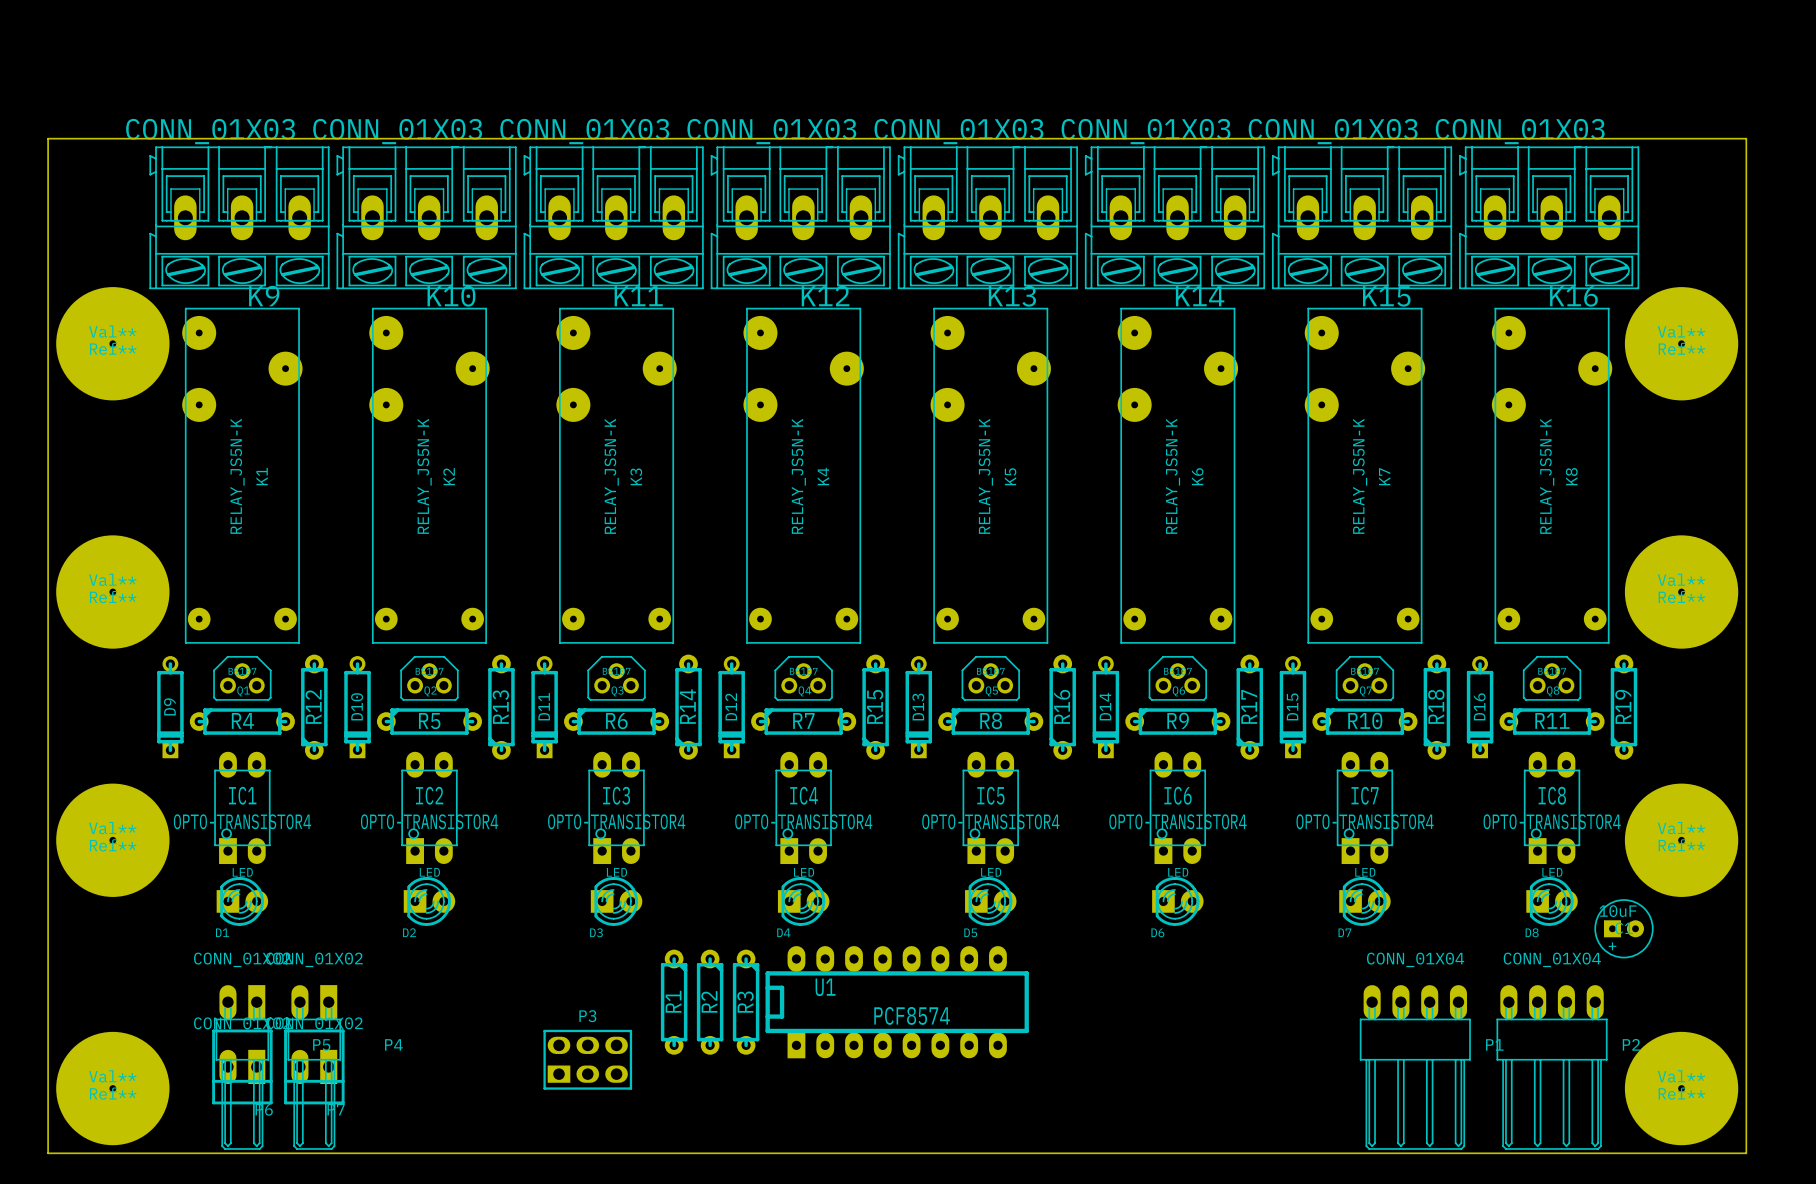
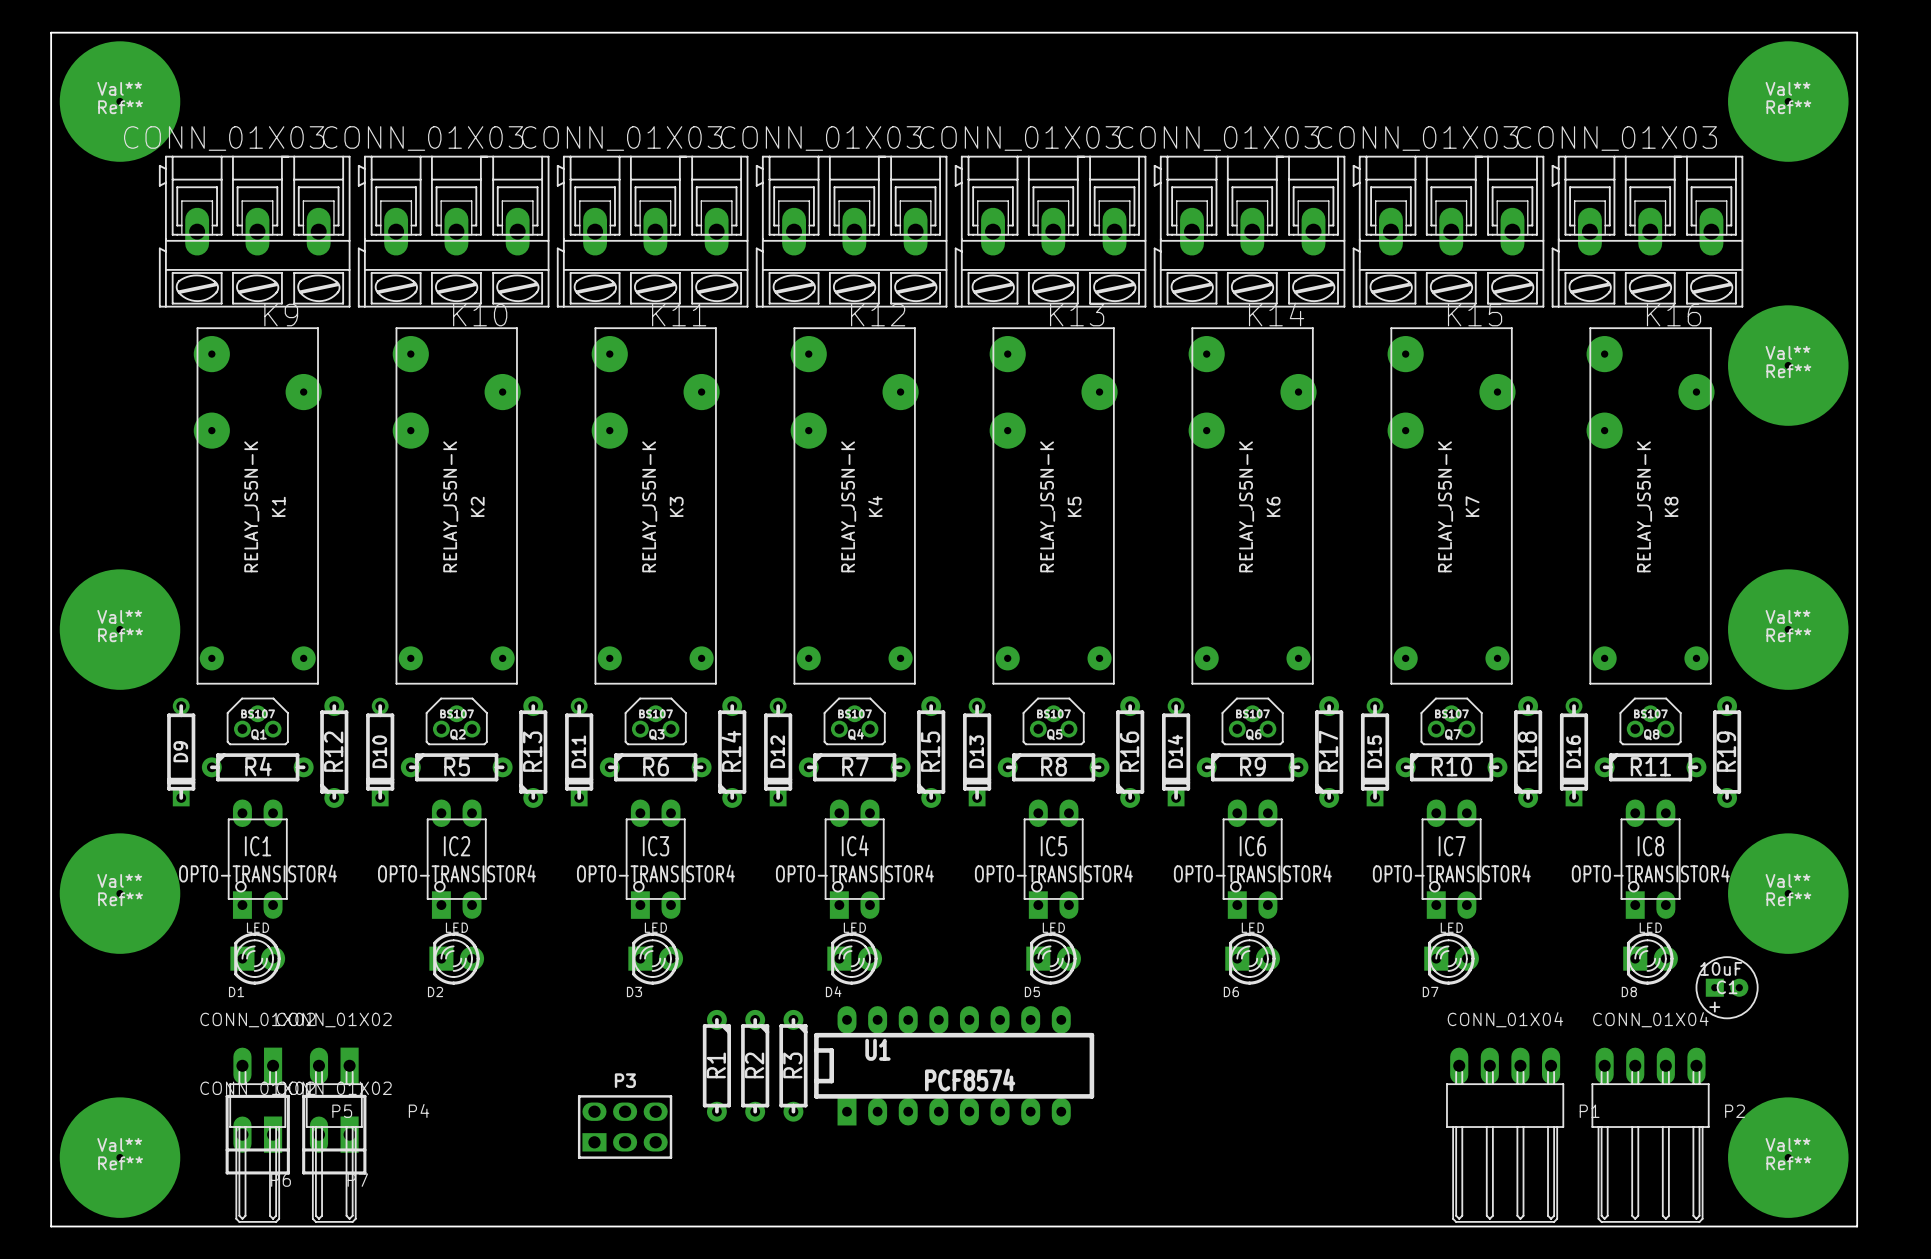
Ref**: none -> Val** (1788, 101)
board edge: (48, 138) (1746, 138) -> (51, 147) (51, 32) (1857, 32) (1857, 147)
Ref** position: (112, 343) -> (120, 101)

